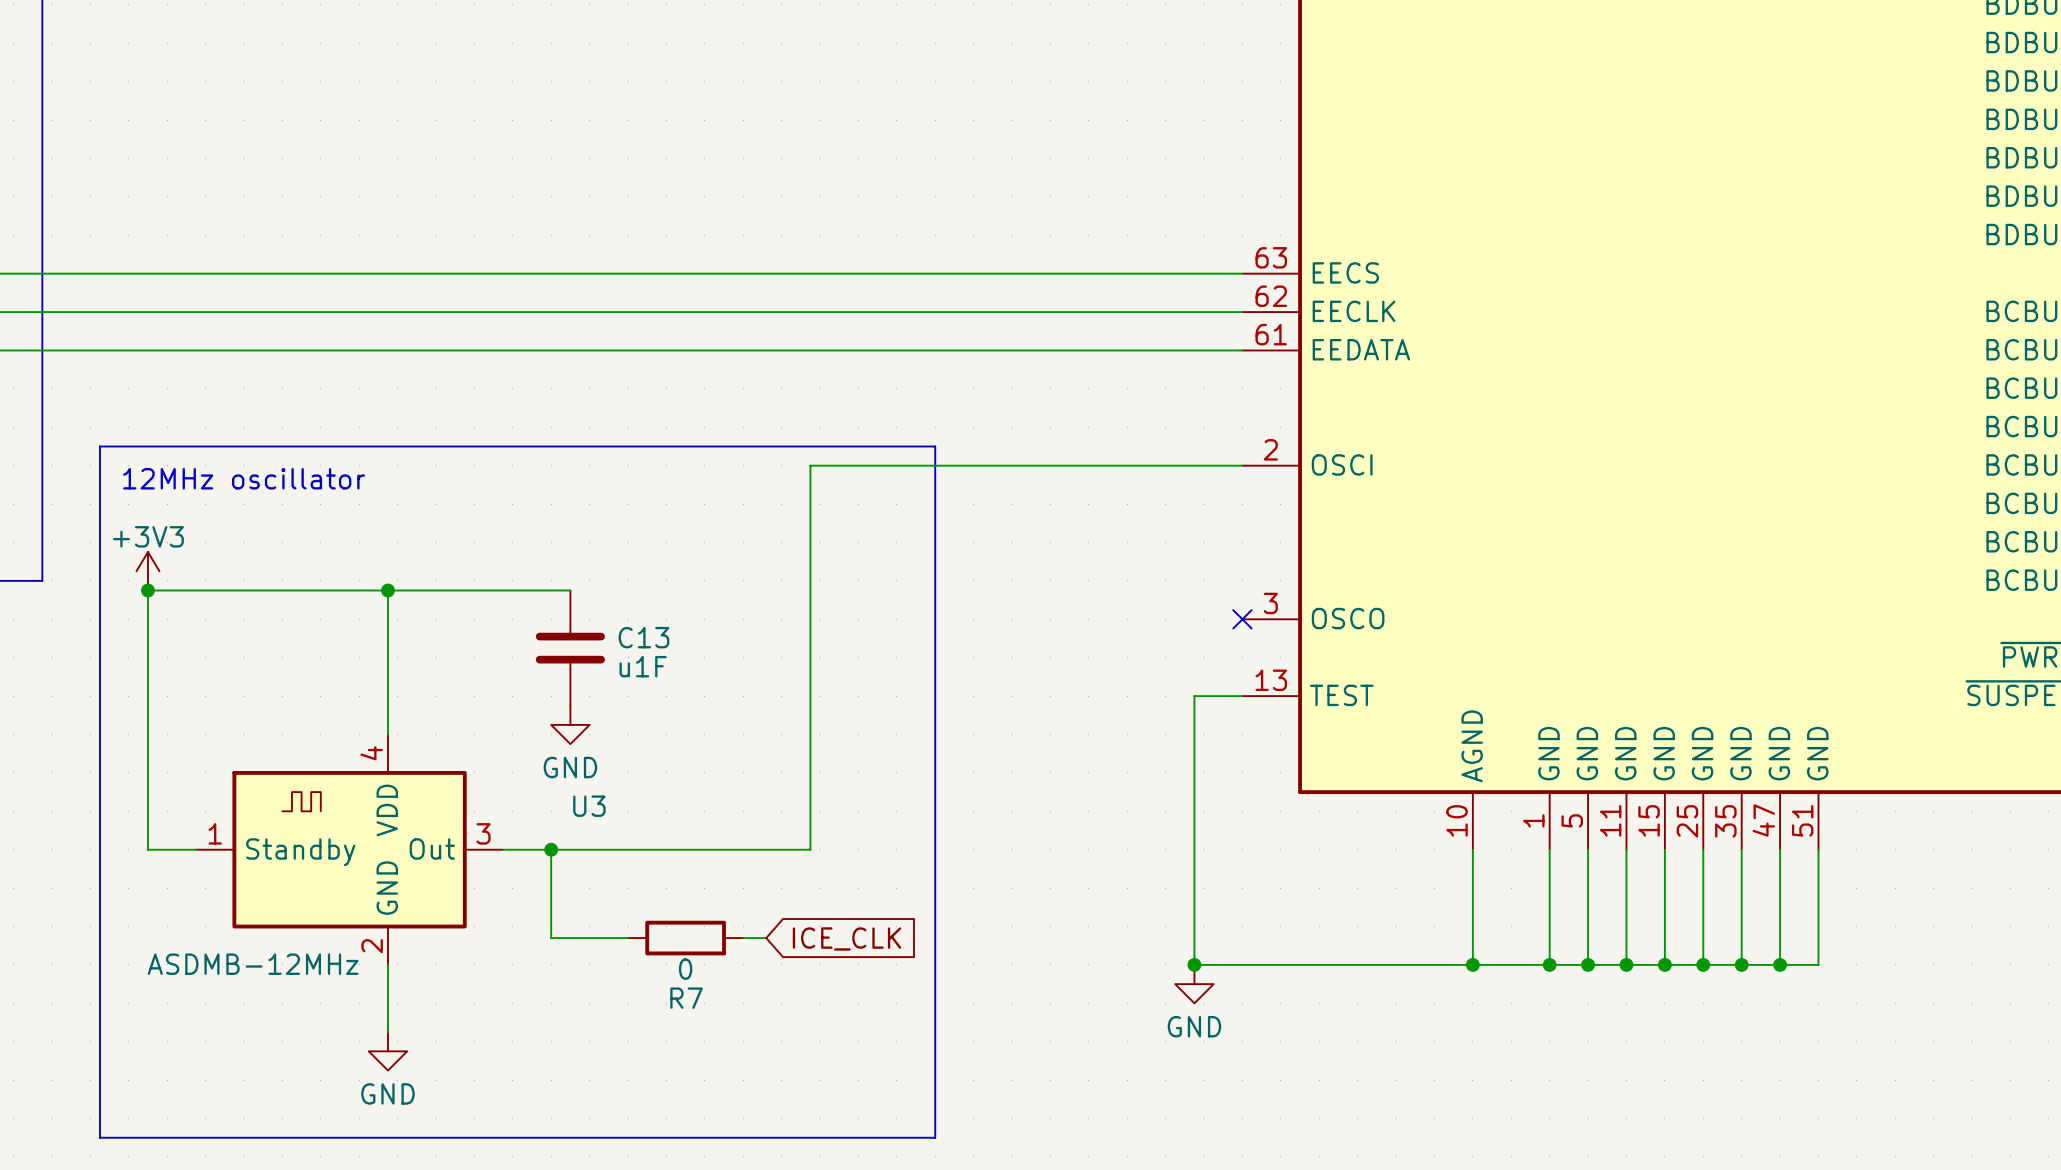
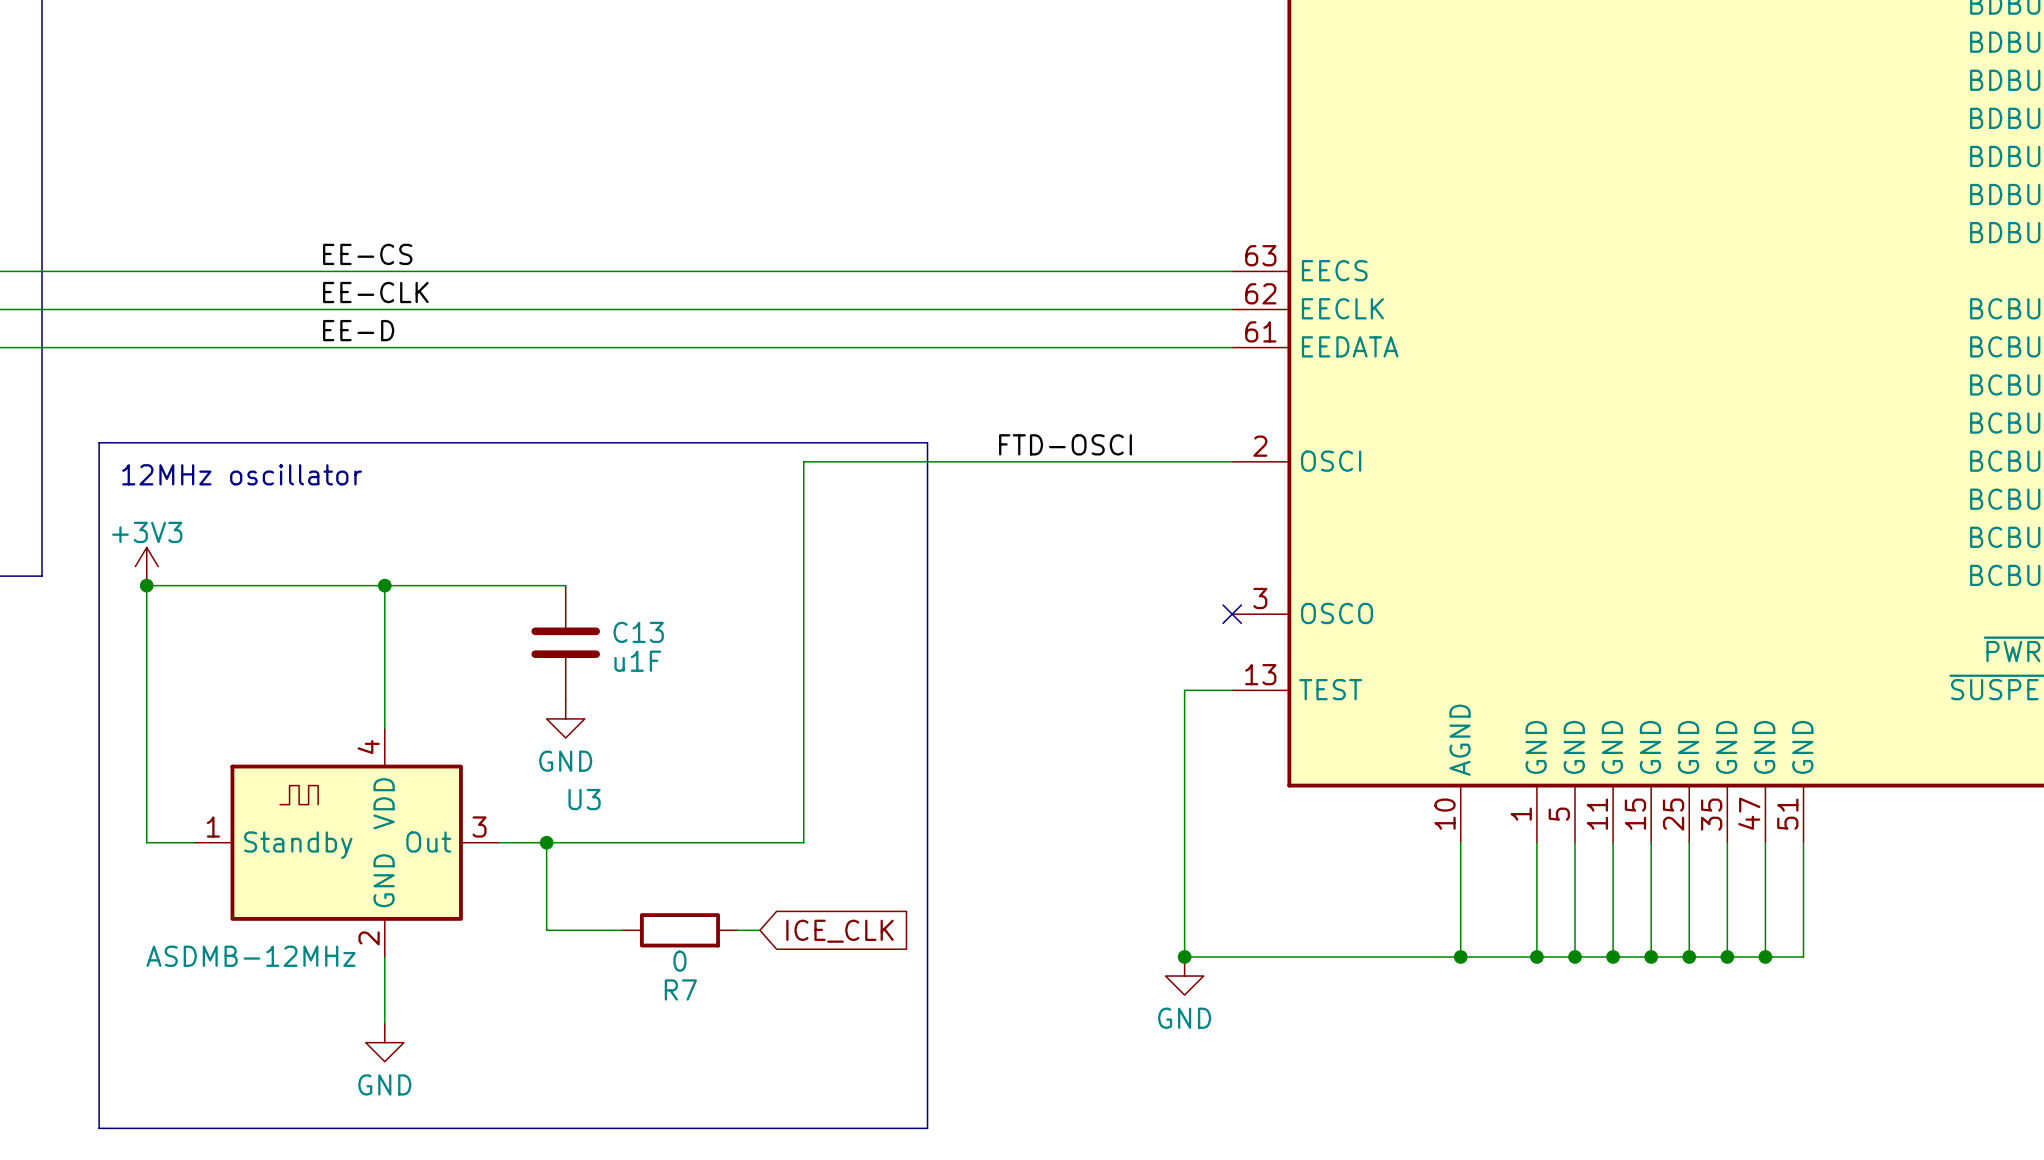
label: none -> EE-CS (367, 254)
label: none -> EE-CLK (375, 292)
label: none -> EE-D (358, 330)
label: none -> FTD-OSCI (1065, 444)

